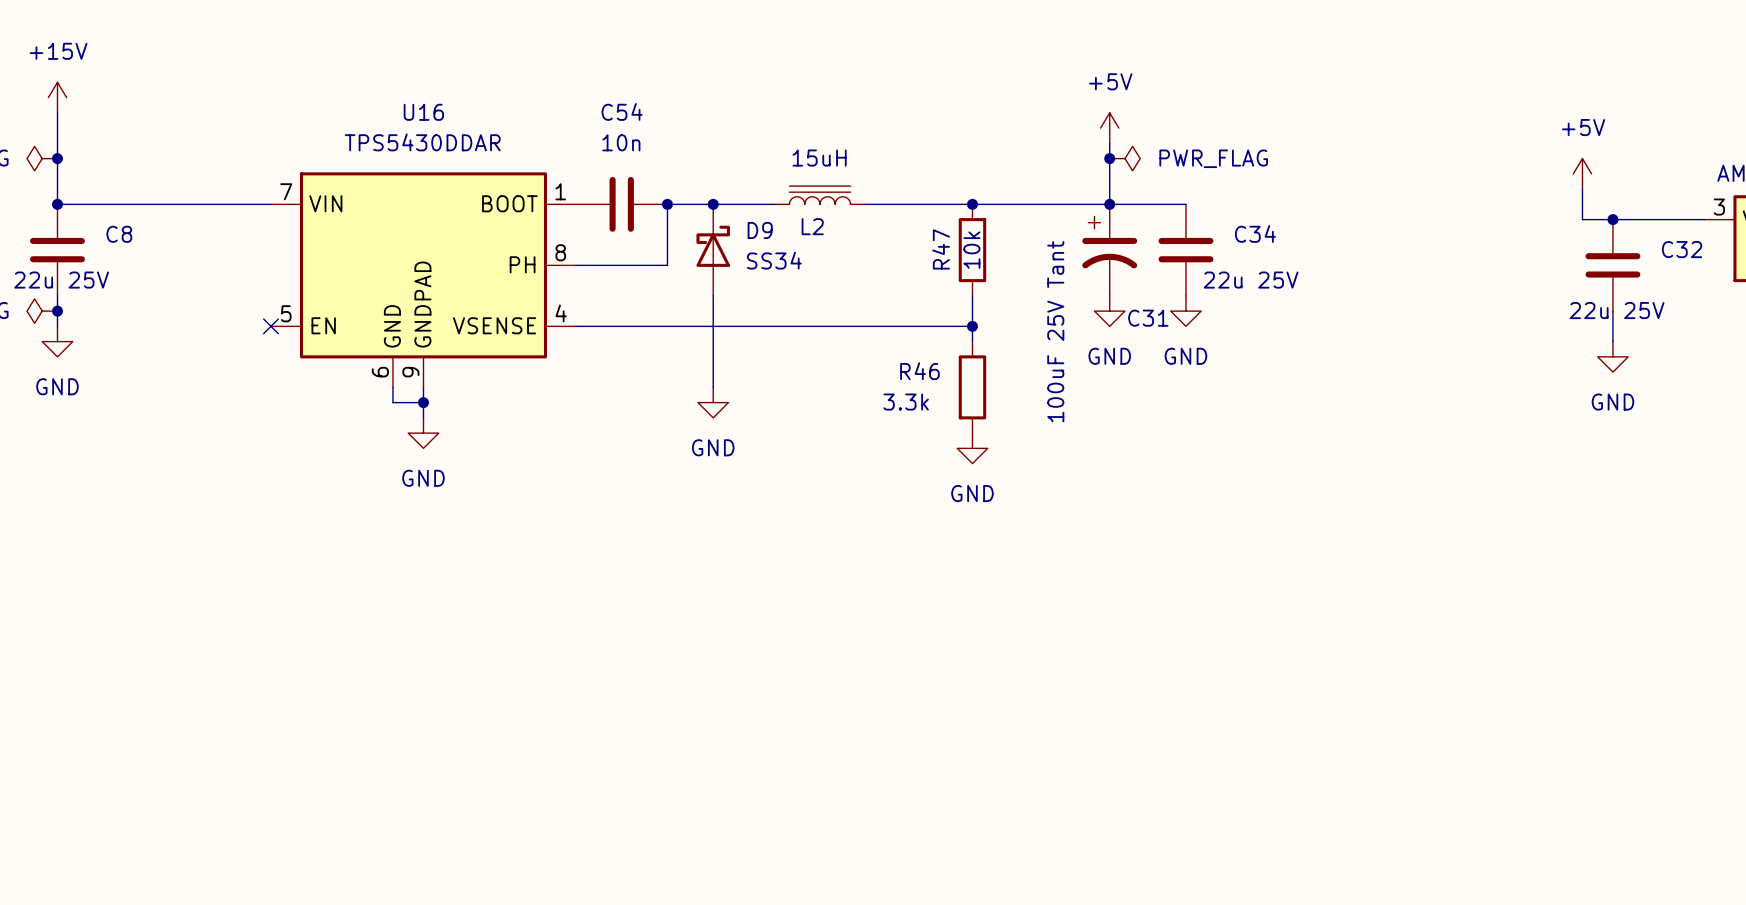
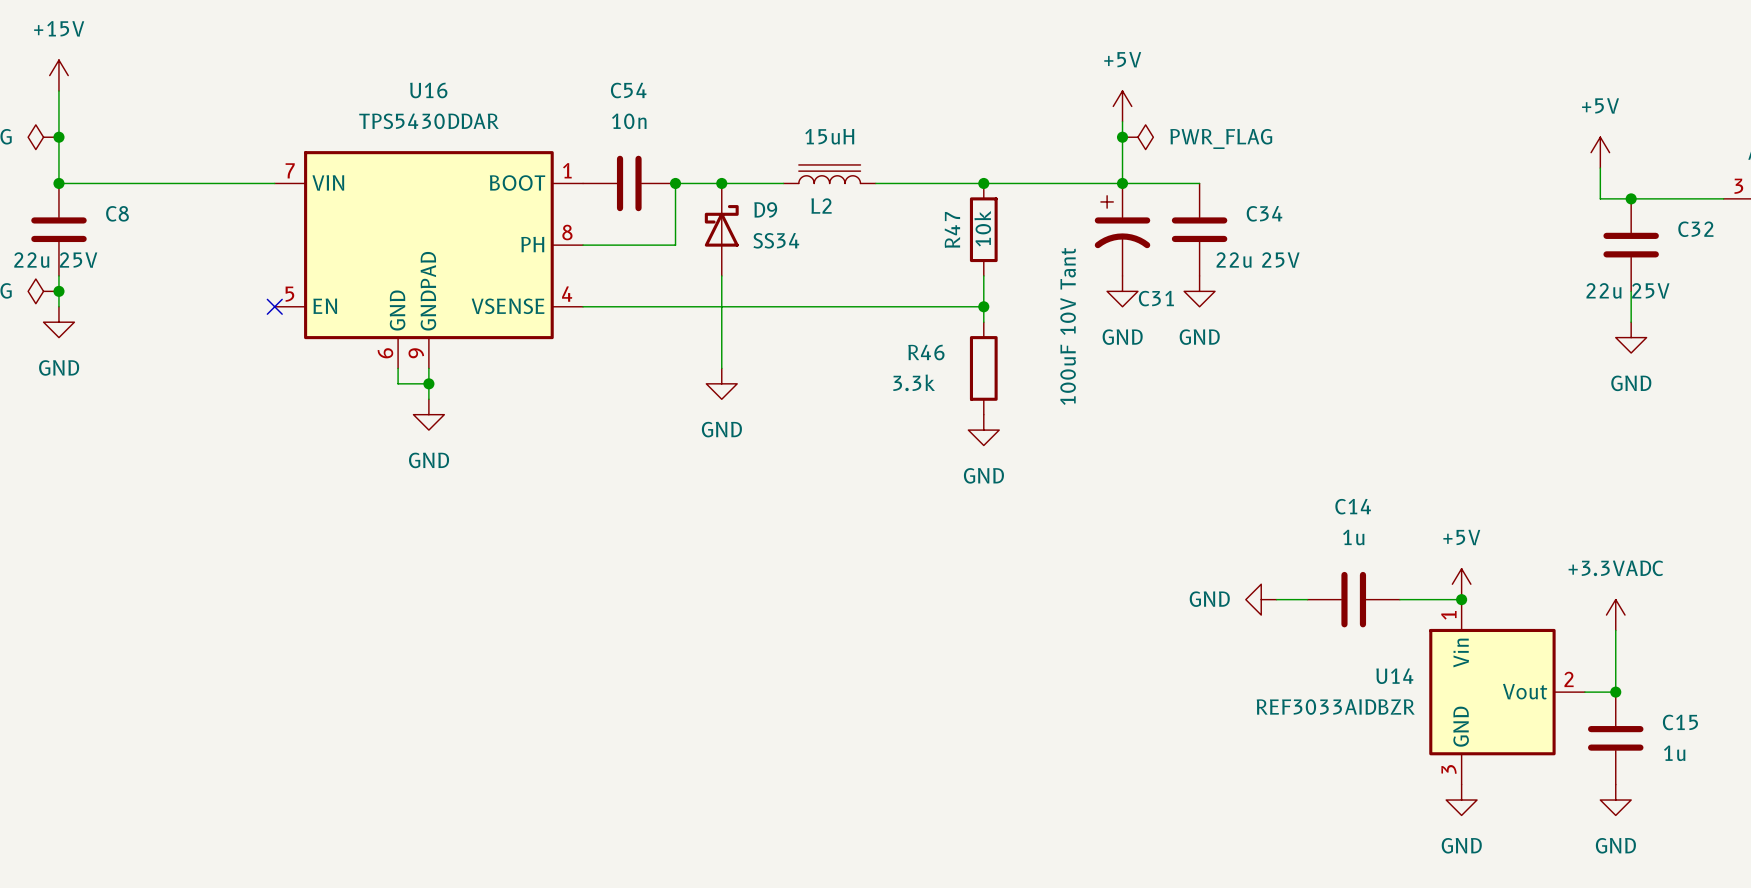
C31 value: 100uF 25V Tant (1055, 331) -> 100uF 10V Tant (1068, 326)
power symbol: none -> +5V (1461, 584)
power symbol: none -> GND (1261, 599)
wire: none -> (1276, 599) (1307, 599)
C14: none -> 1u (1353, 599)
wire: none -> (1399, 599) (1461, 599)
junction: none -> (1461, 599)
power symbol: none -> +3.3VADC (1615, 615)
wire: none -> (1615, 630) (1615, 692) (1584, 692)
U14: none -> REF3033AIDBZR (1507, 692)
junction: none -> (1615, 692)
C15: none -> 1u (1615, 738)
power symbol: none -> GND (1461, 800)
power symbol: none -> GND (1615, 800)

